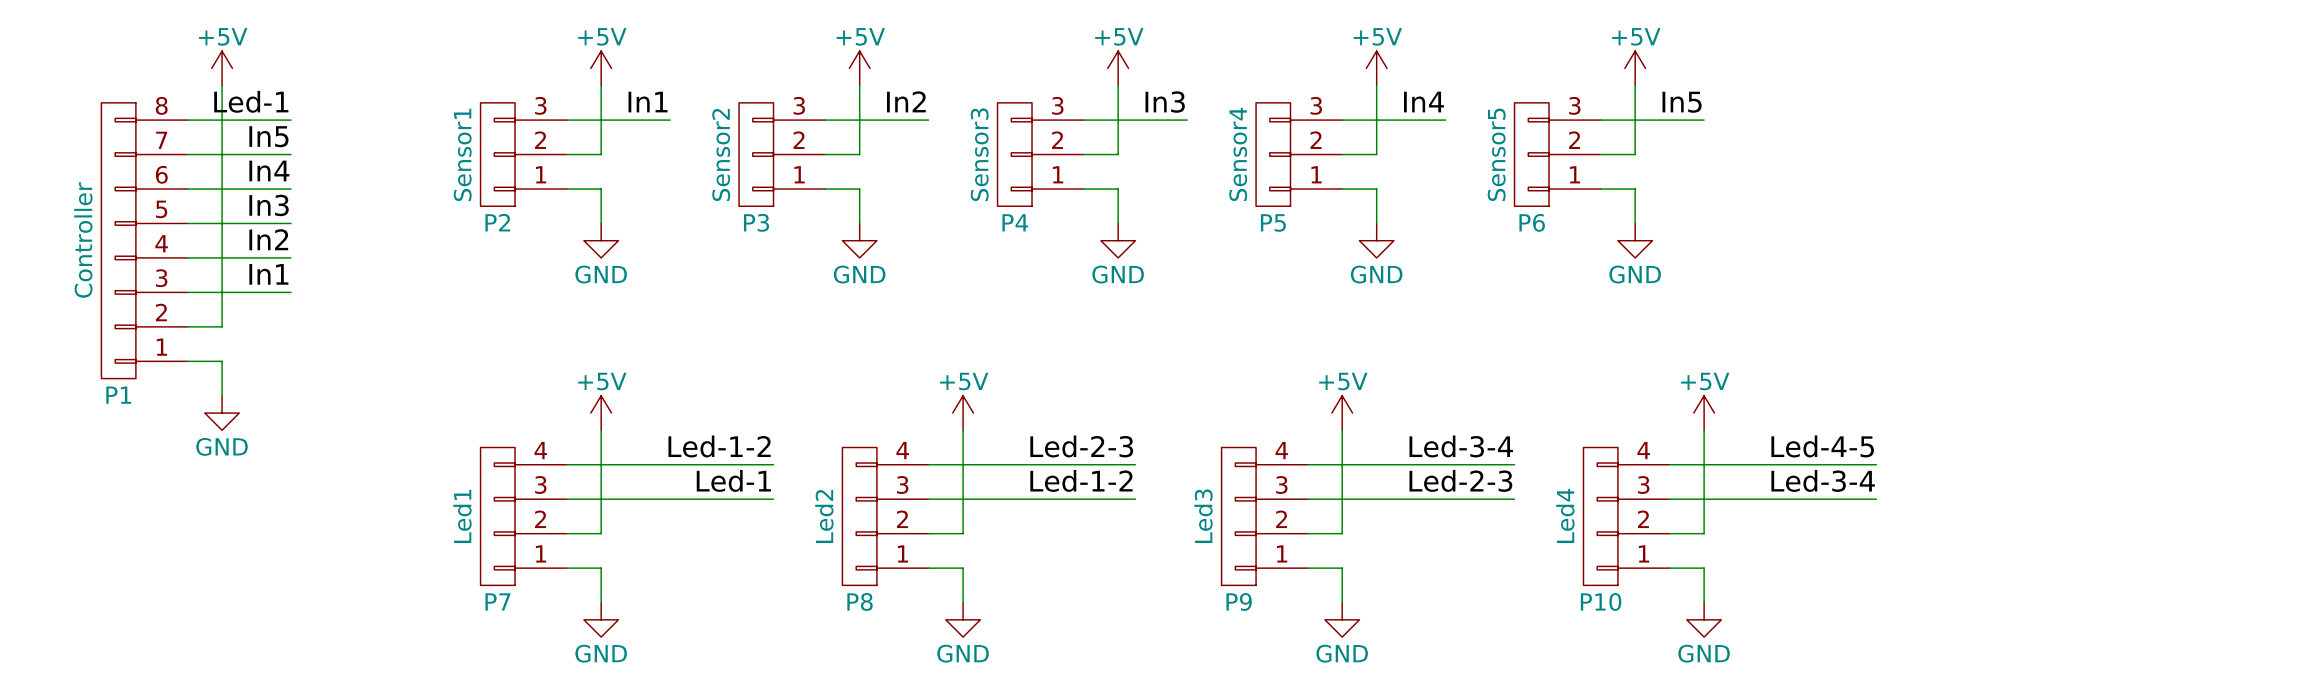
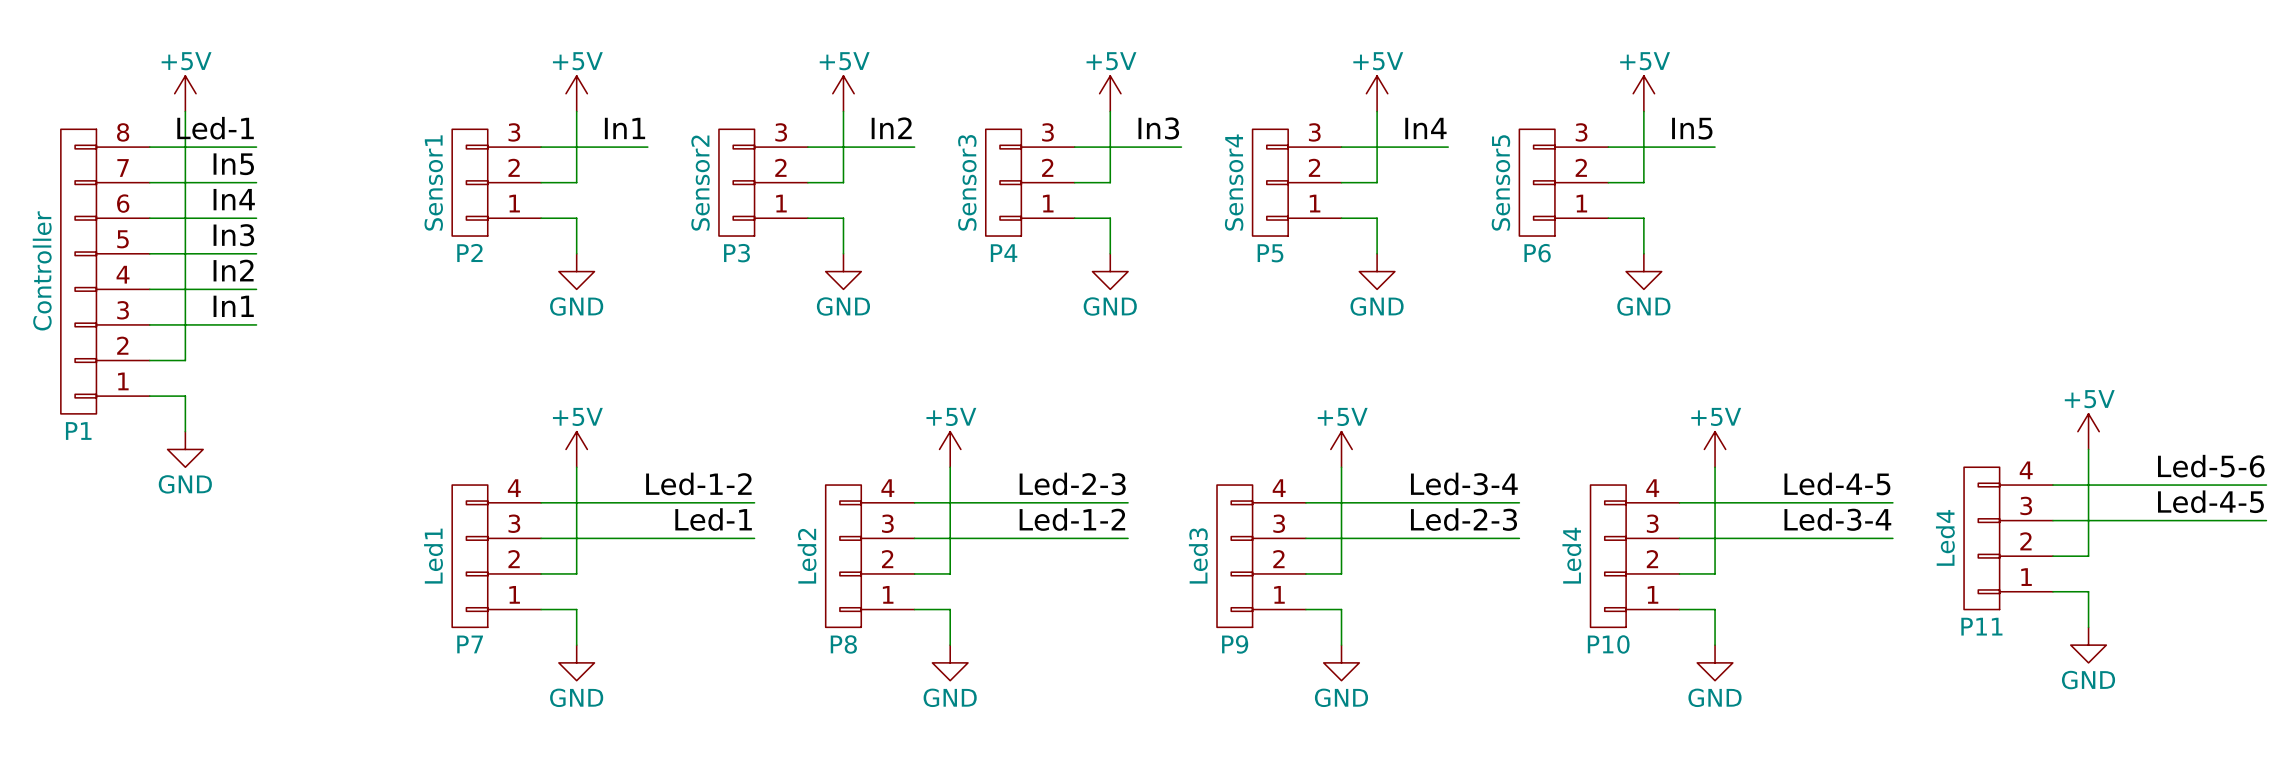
power symbol: none -> +5V (2088, 431)
wire: none -> (2088, 449) (2088, 556) (2052, 556)
label: none -> Led-5-6 (2211, 466)
wire: none -> (2052, 485) (2266, 485)
label: none -> Led-4-5 (2210, 501)
wire: none -> (2052, 520) (2266, 520)
P11: none -> Led4 (2008, 538)
wire: none -> (2052, 591) (2088, 591) (2088, 627)
power symbol: none -> GND (2088, 645)

